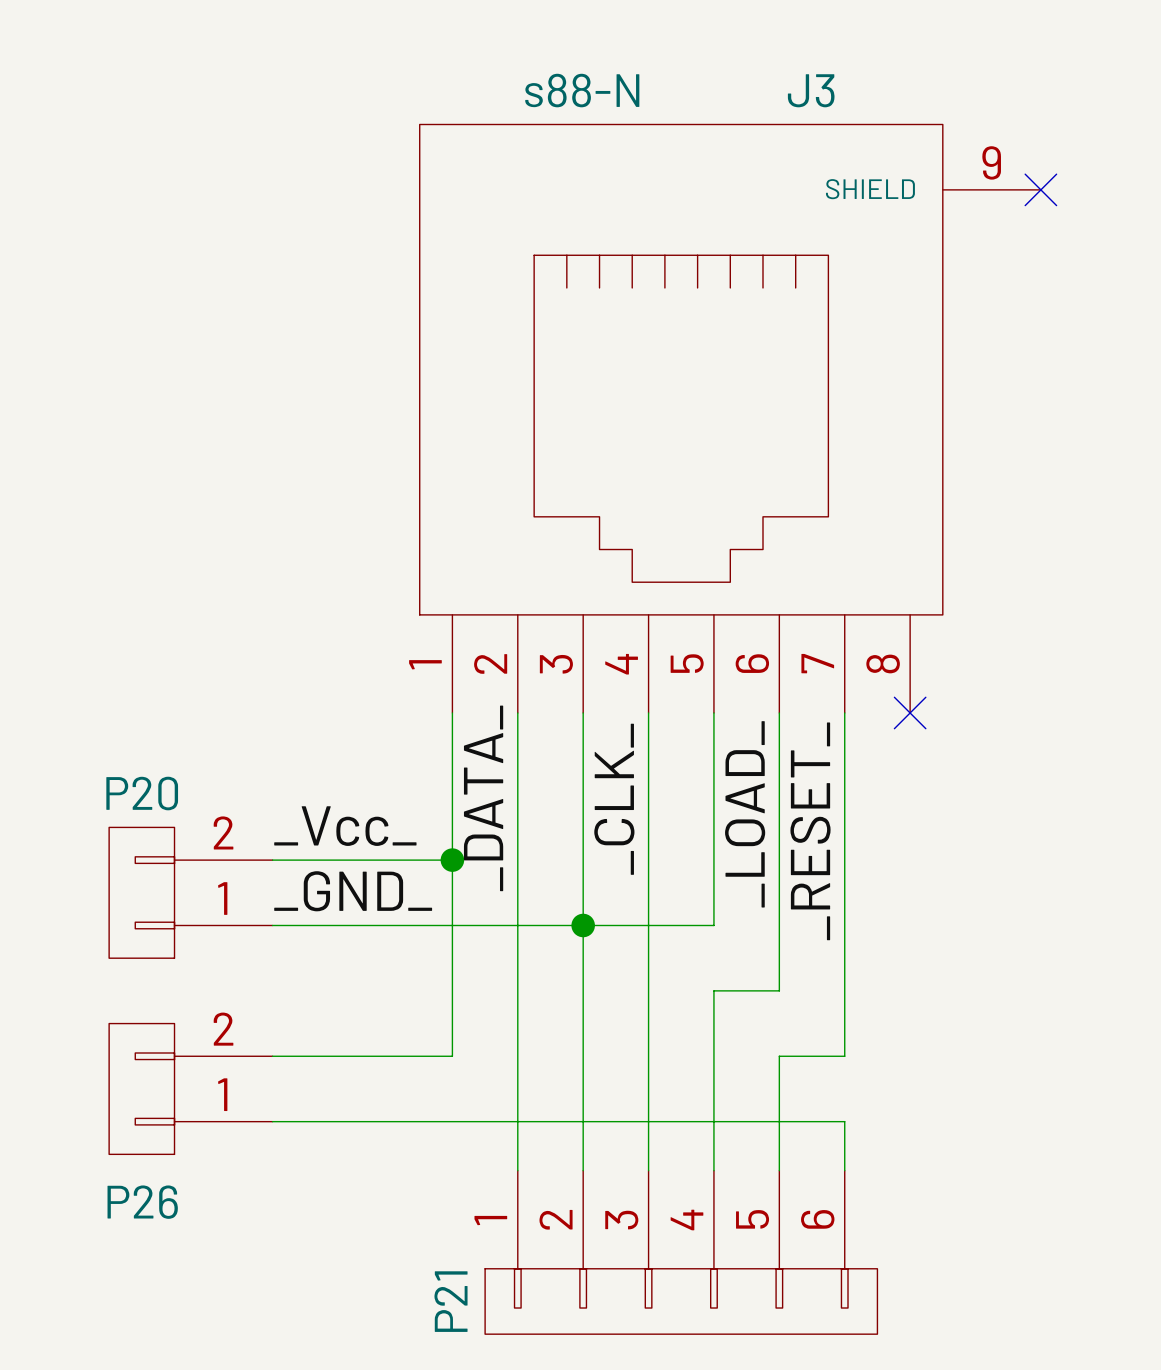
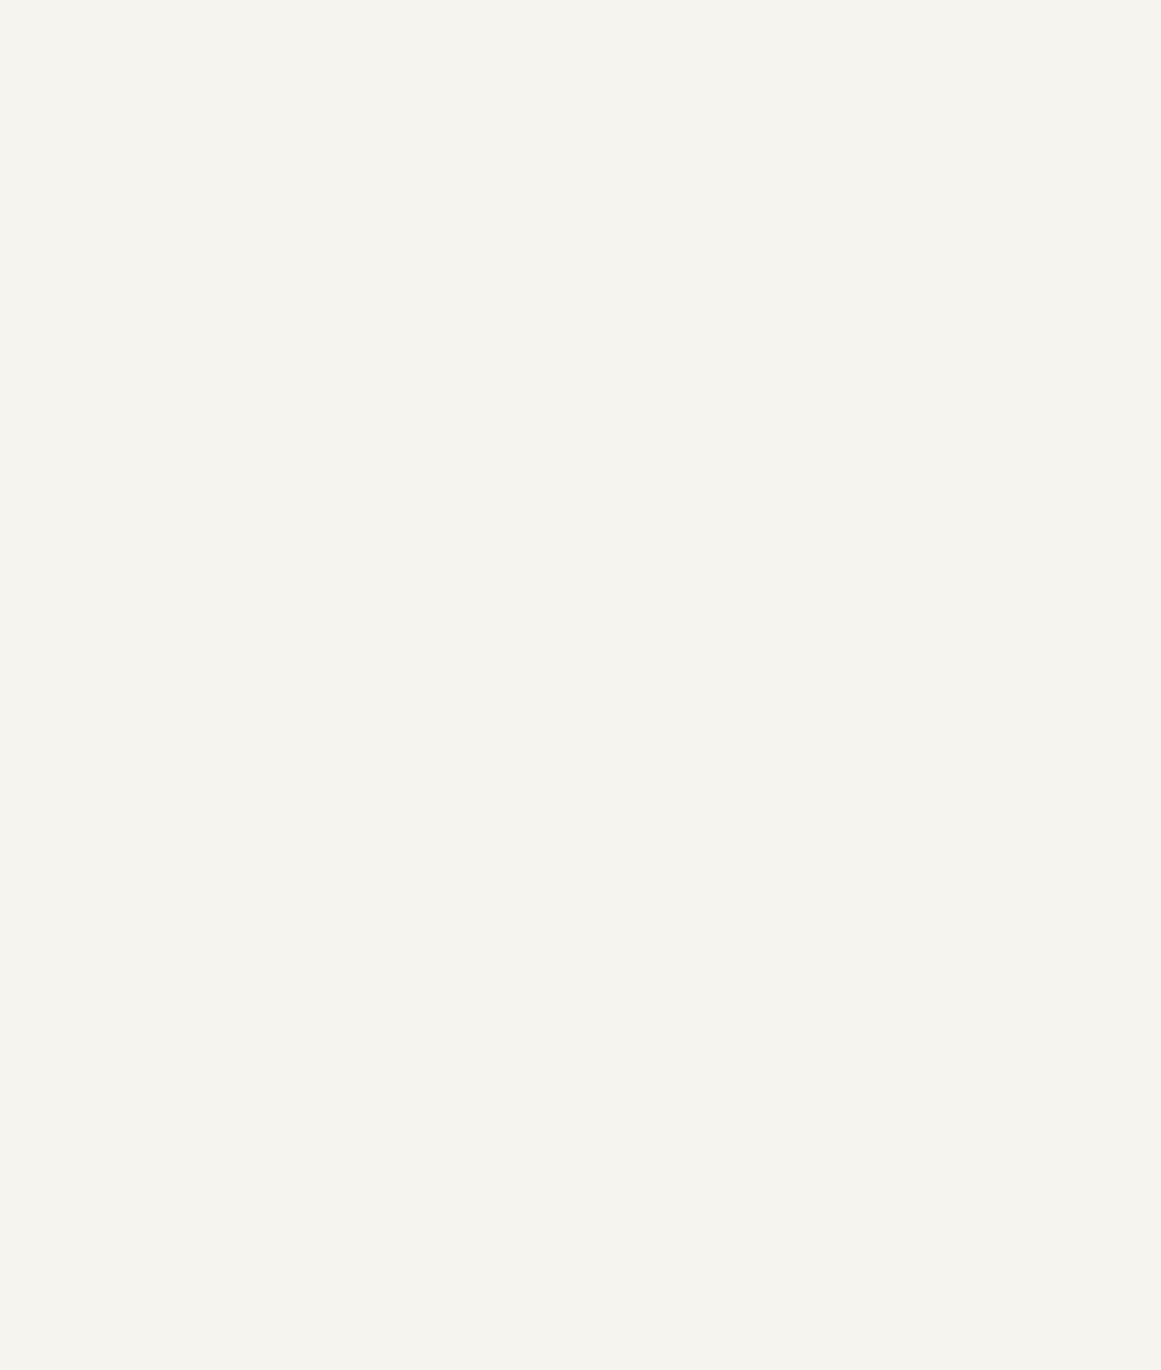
no-connect mark: (1040, 189) -> none
J3: s88-N (730, 418) -> none
wire: (452, 712) (452, 1056) (272, 1056) -> none
wire: (517, 712) (517, 1170) -> none
wire: (583, 712) (583, 1170) -> none
wire: (648, 712) (648, 1170) -> none
wire: (713, 712) (713, 925) (272, 925) -> none
wire: (779, 712) (779, 990) (713, 990) (713, 1170) -> none
wire: (844, 712) (844, 1056) (779, 1056) (779, 1170) -> none
no-connect mark: (910, 712) -> none
label: _DATA_ (483, 798) -> none
label: _CLK_ (614, 799) -> none
label: _LOAD_ (745, 814) -> none
label: _Vcc_ (345, 826) -> none
label: _RESET_ (810, 831) -> none
wire: (272, 860) (452, 860) -> none
junction: (452, 860) -> none
label: _GND_ (353, 891) -> none
P20: (190, 892) -> none
junction: (583, 925) -> none
P26: (190, 1088) -> none
wire: (272, 1121) (844, 1121) (844, 1170) -> none
P21: (681, 1252) -> none

